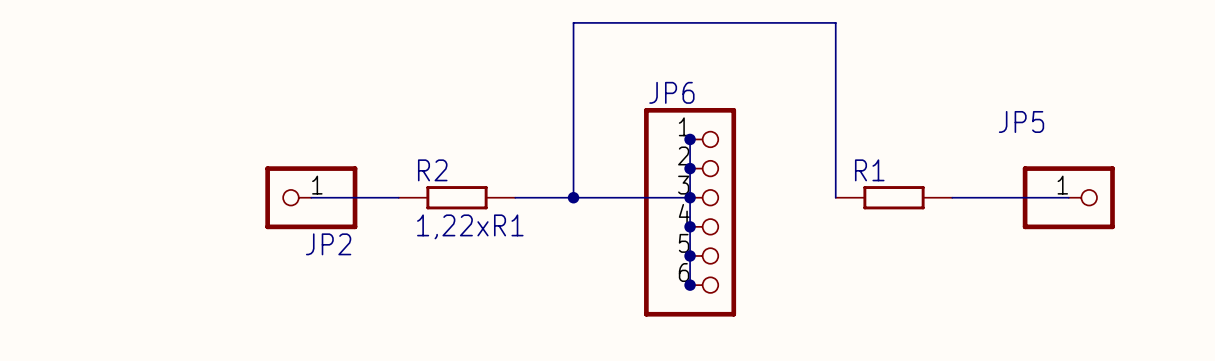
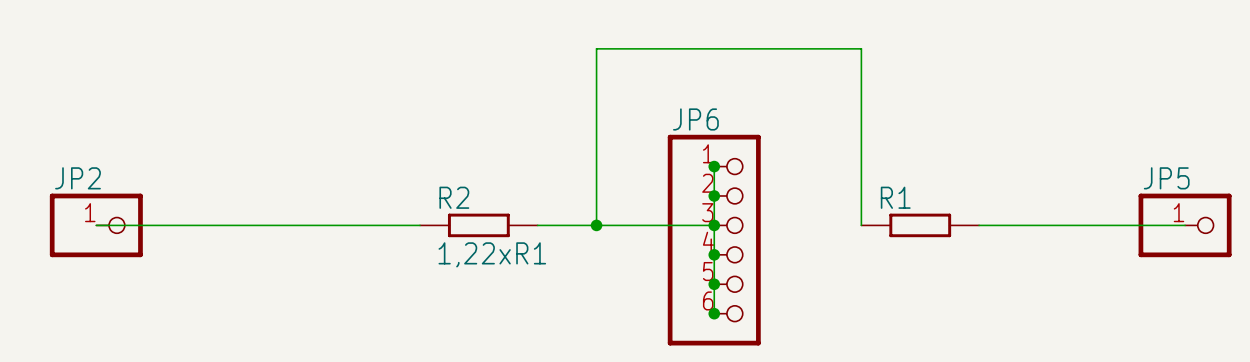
JP5 name position: JP5 (1021, 121) -> JP5 (1166, 178)
wire: none -> (96, 225) (331, 225)
JP2 rotation: 0° (311, 197) -> 180° (96, 225)
JP2 position: (311, 197) -> (96, 225)
wire: none -> (1096, 225) (1185, 225)
JP5 position: (1068, 197) -> (1185, 225)

